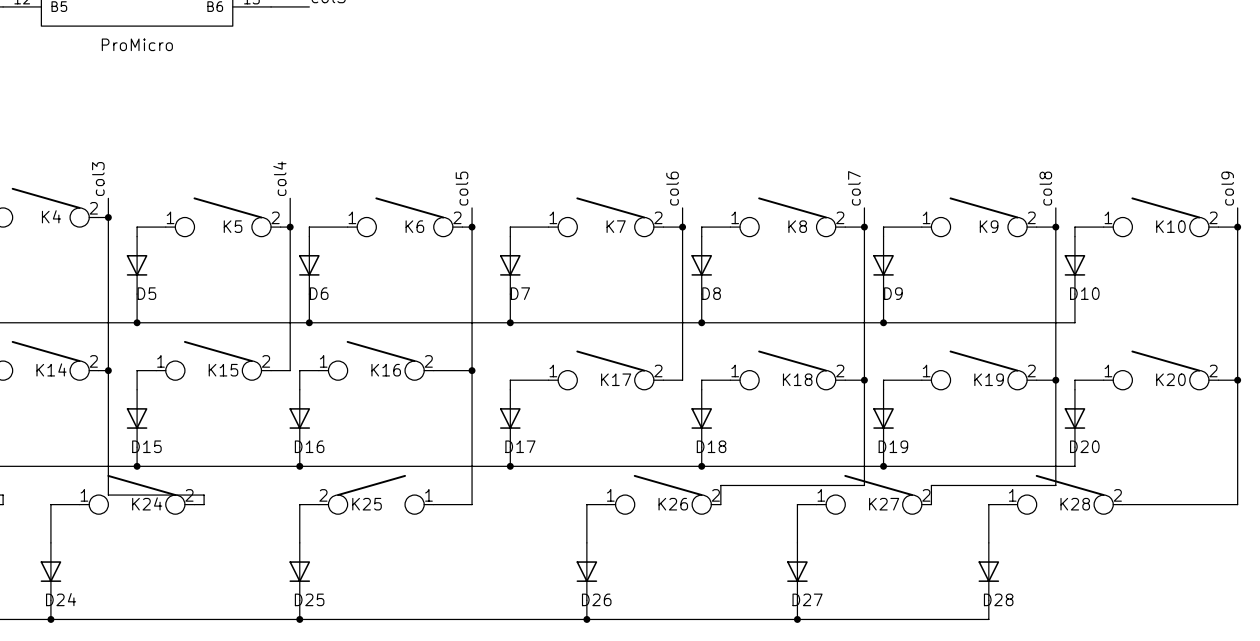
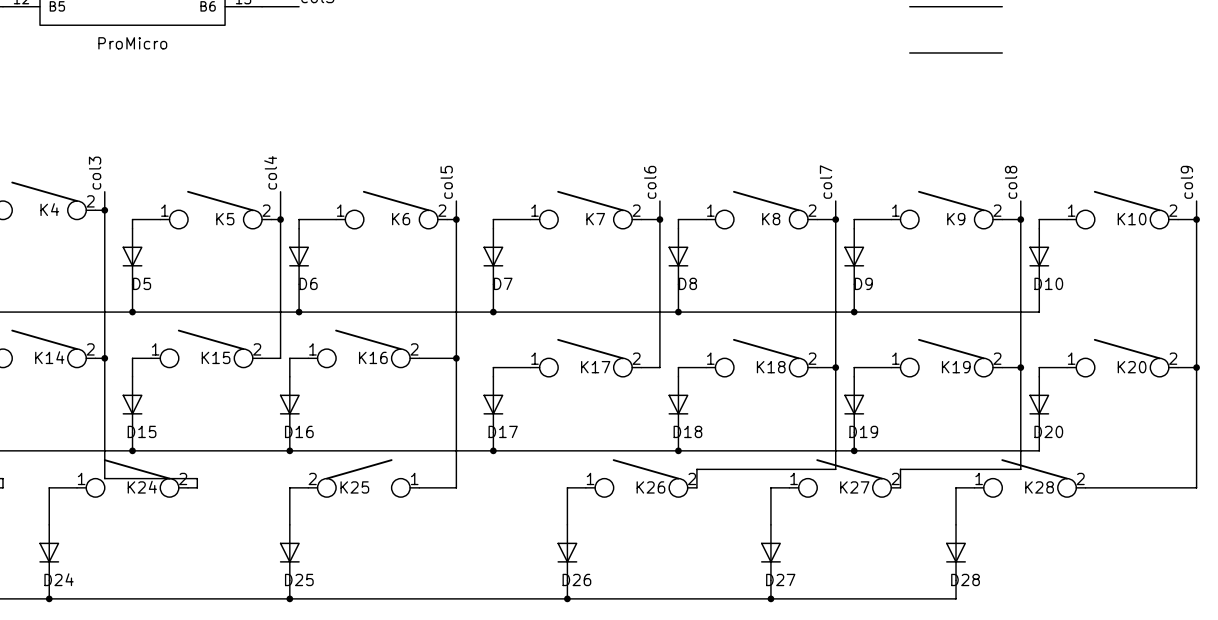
wire: none -> (909, 6) (1002, 6)
wire: none -> (909, 52) (1002, 52)

